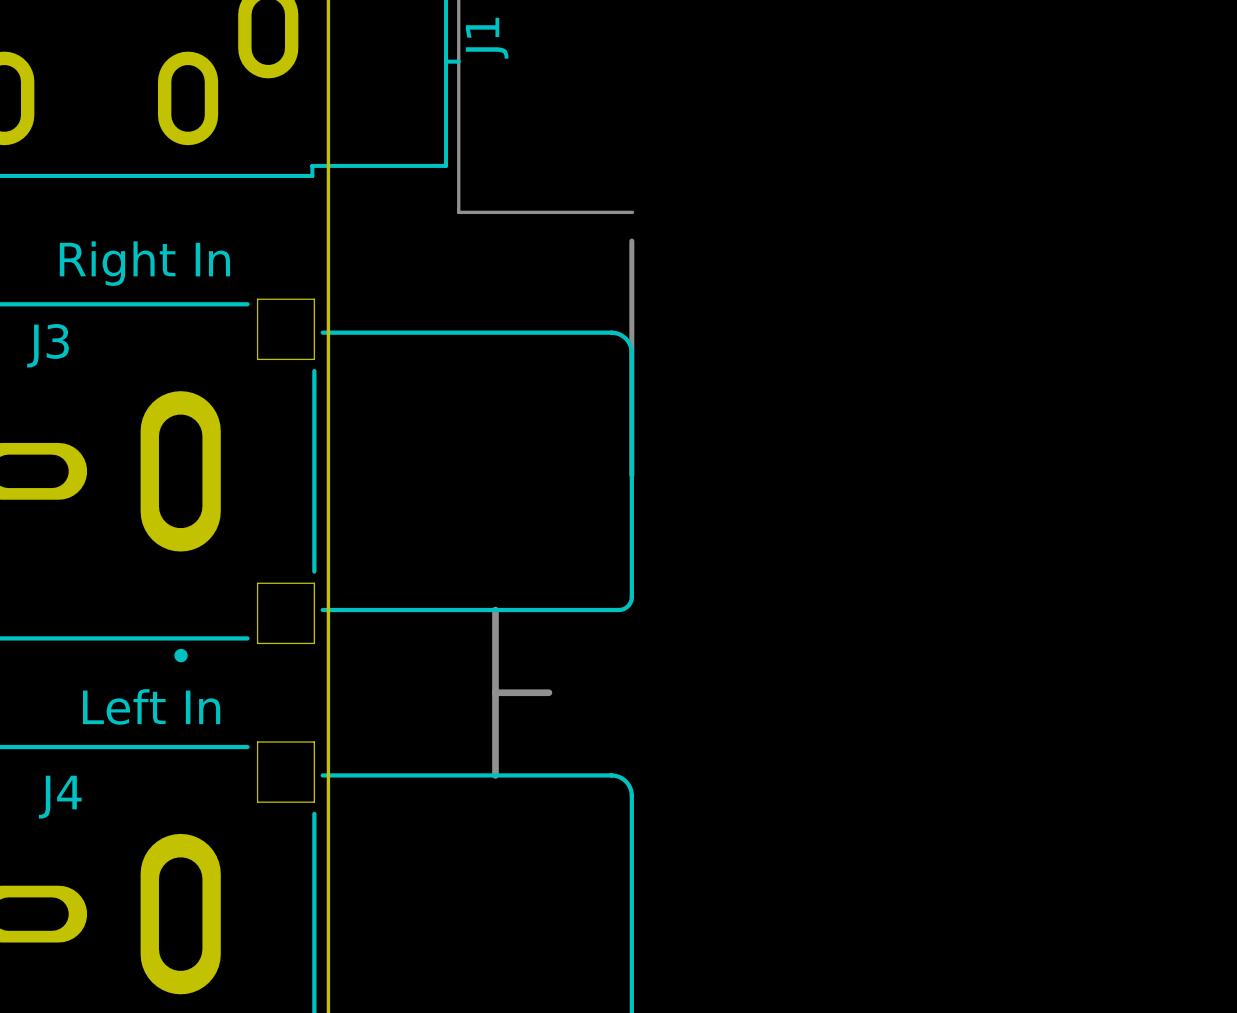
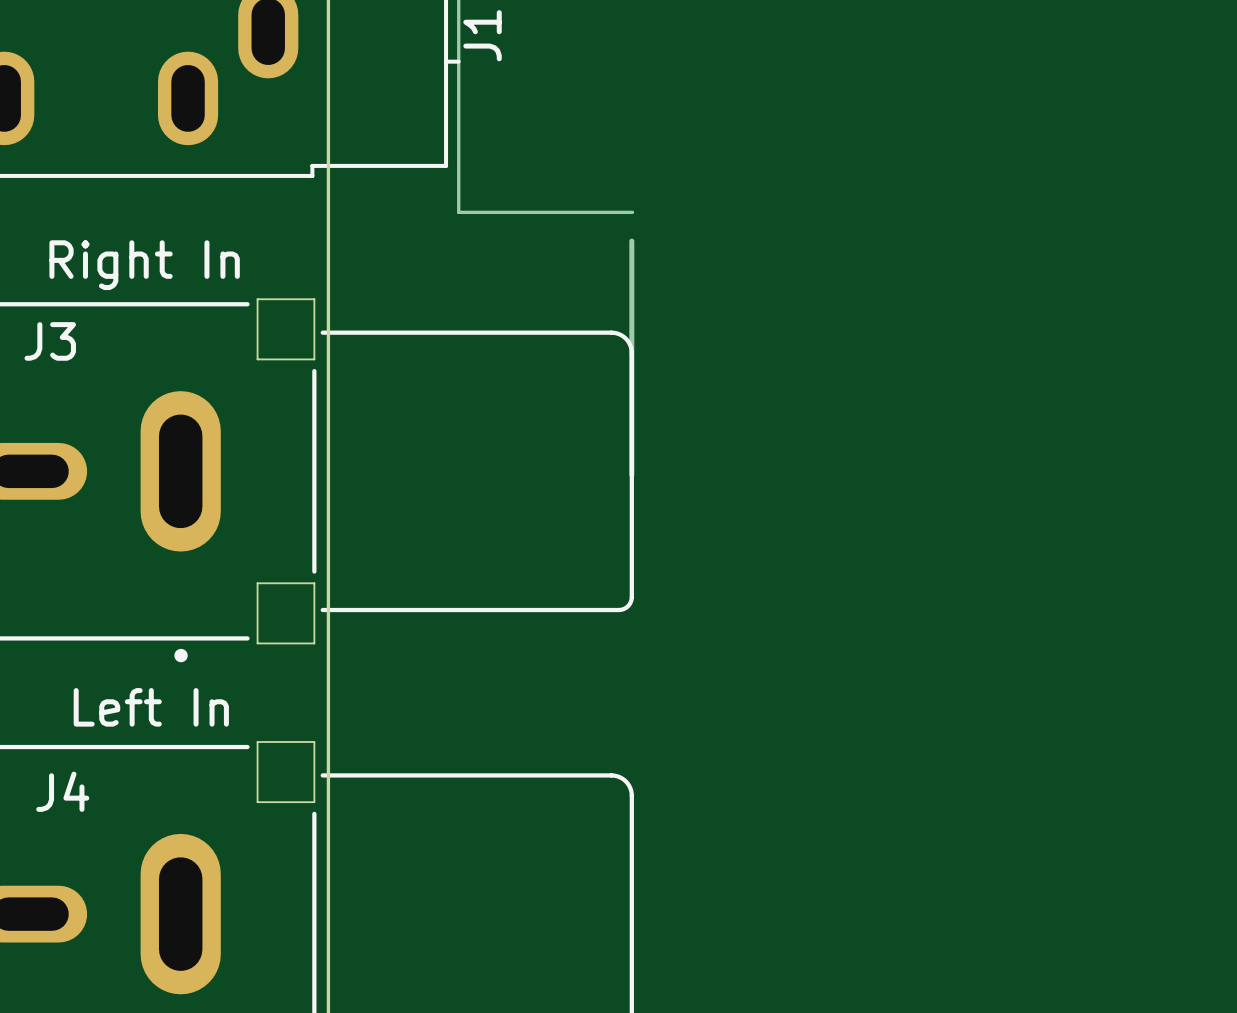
line: (495, 610) (495, 775) -> none
line: (495, 692) (548, 692) -> none

